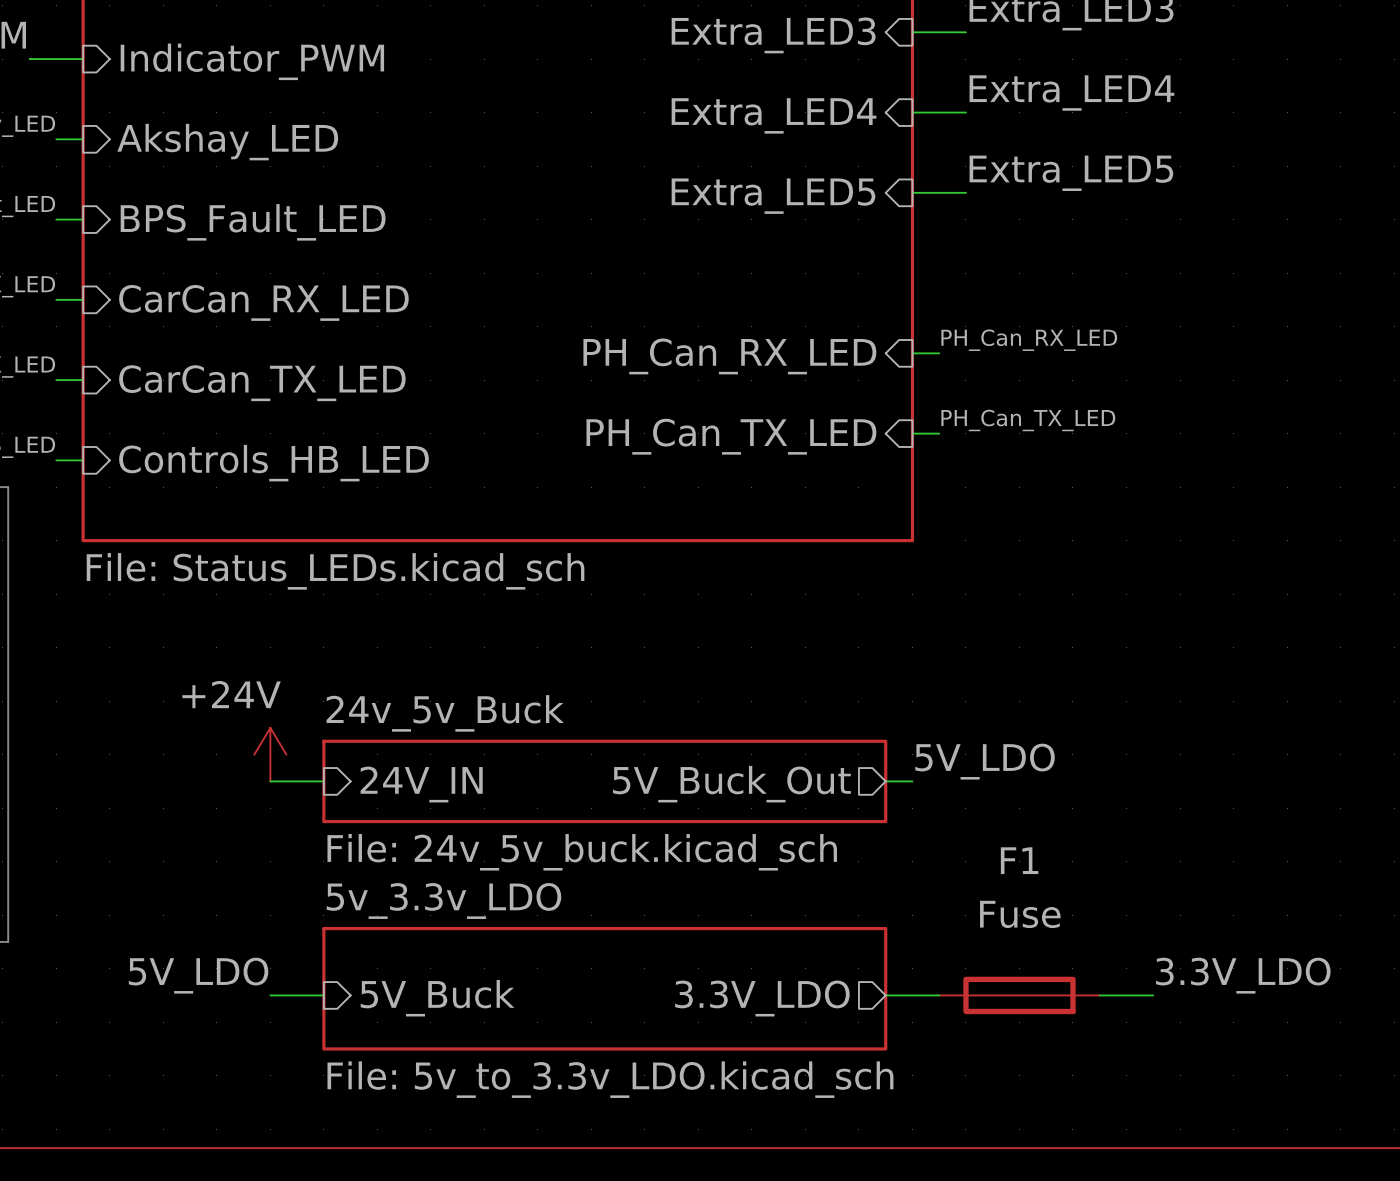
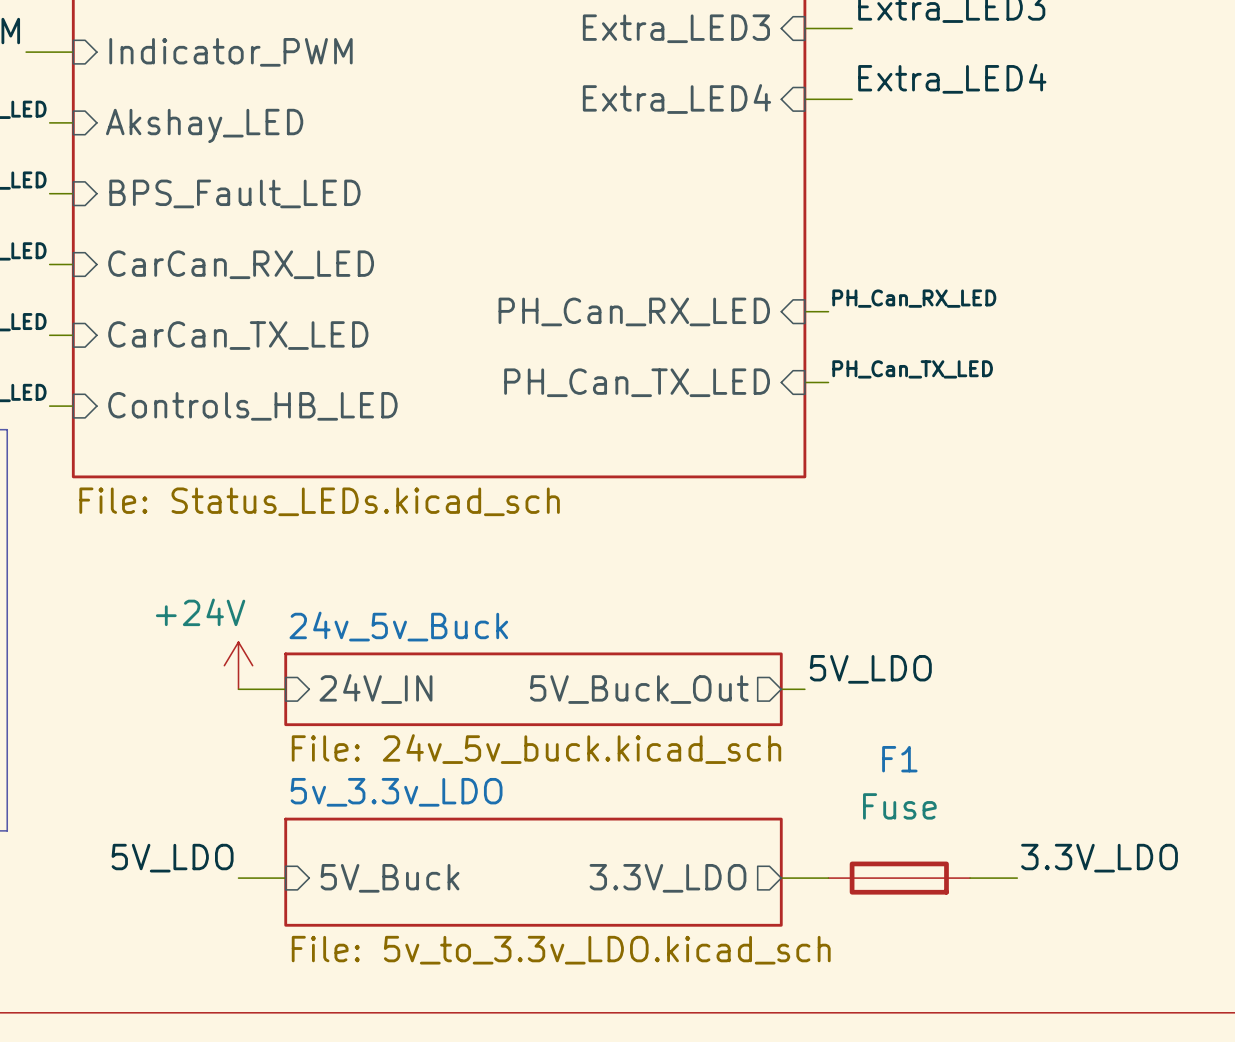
label: Extra_LED5 (1071, 173) -> none
wire: (912, 192) (965, 192) -> none
sheet pin: Extra_LED5 (773, 196) -> none

